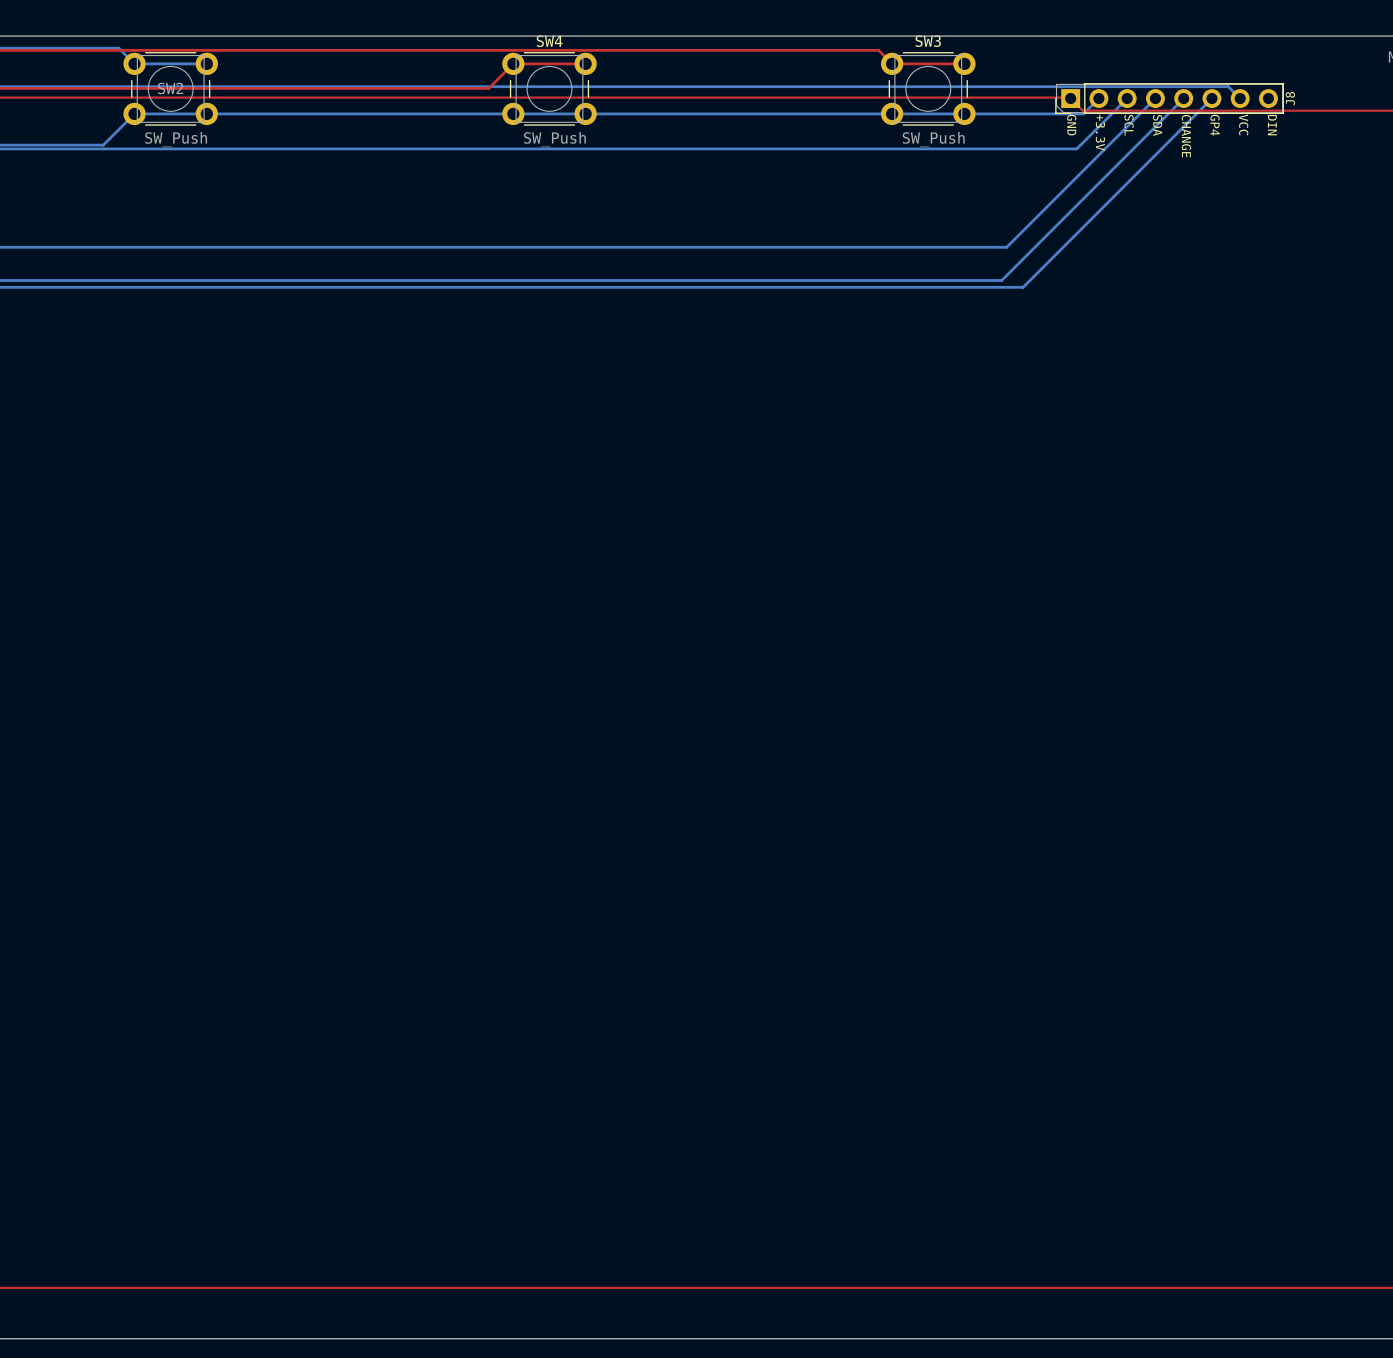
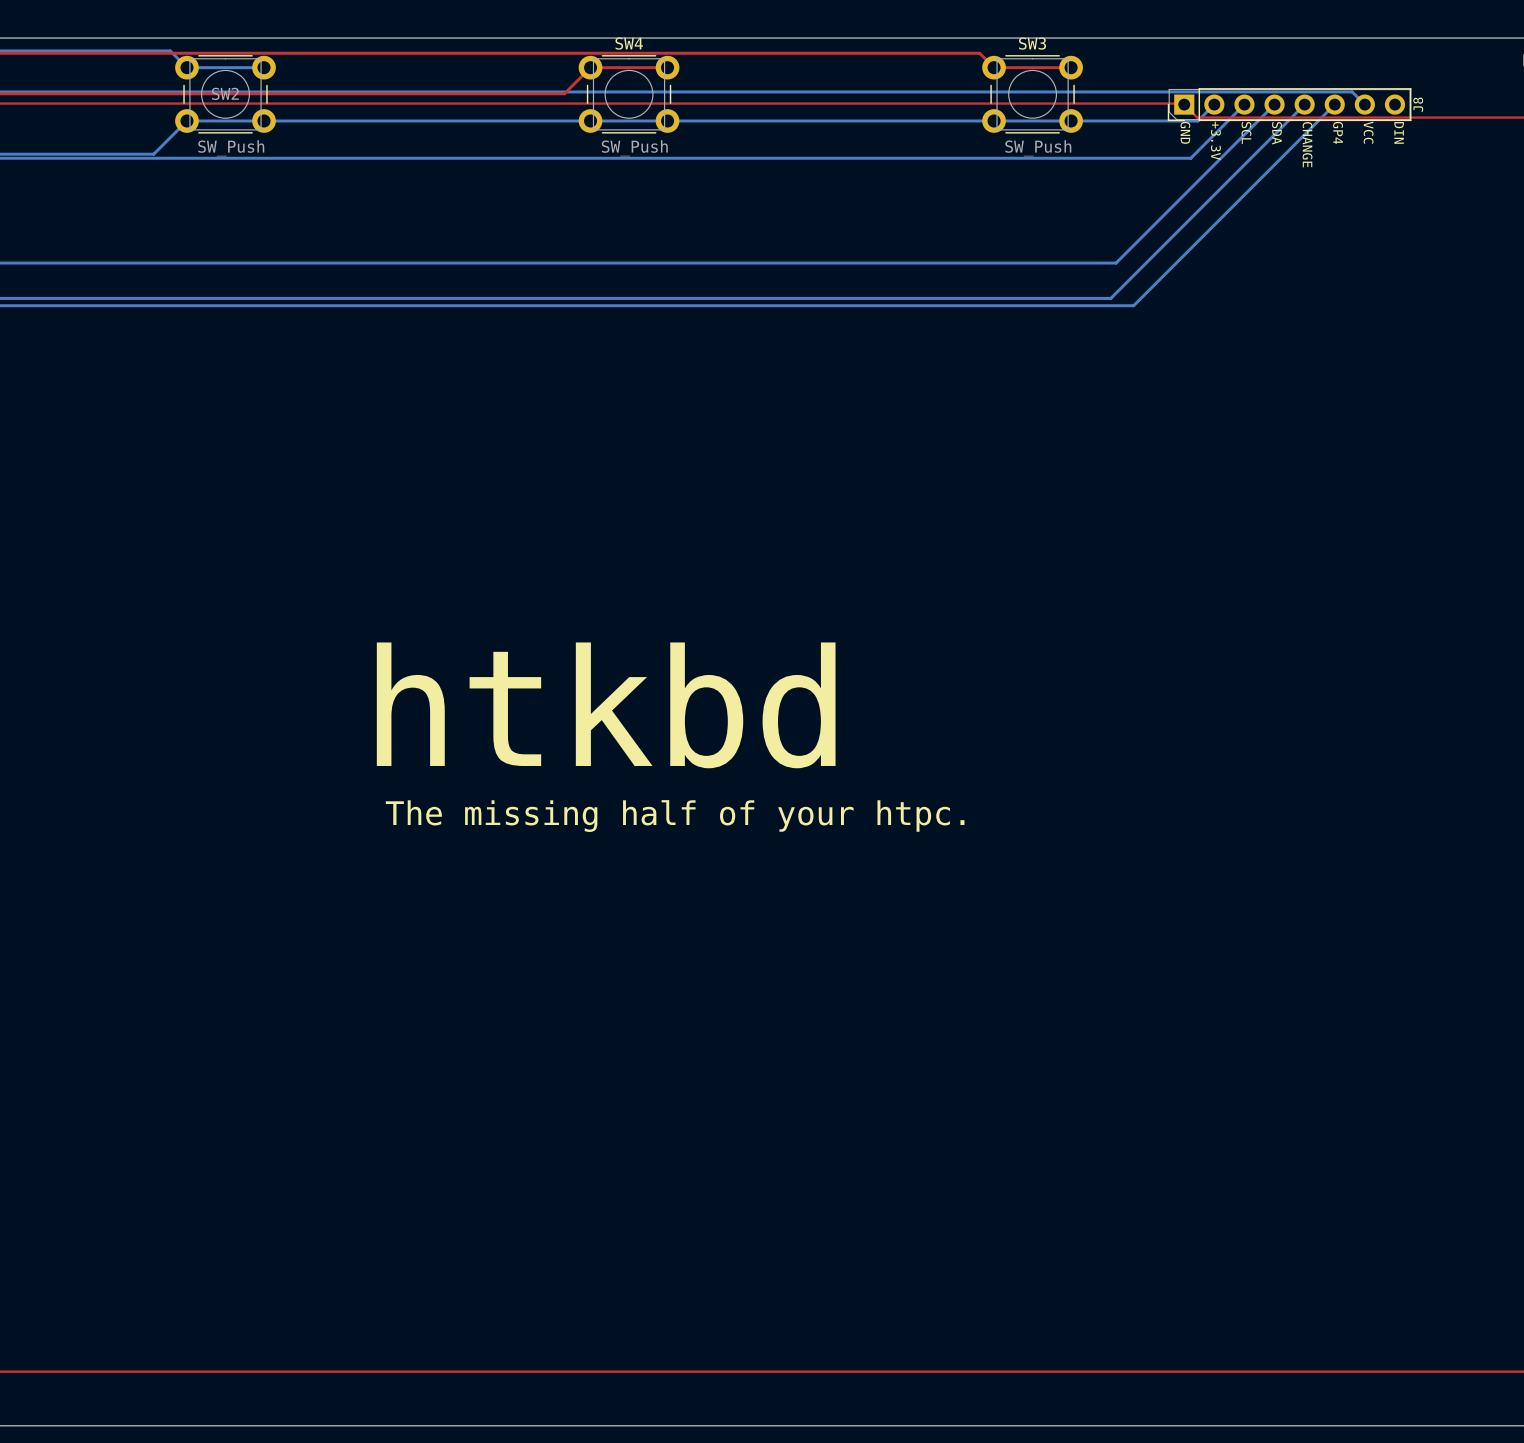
text: none -> htkbd (606, 705)
text: none -> The missing half of your htpc. (675, 816)

